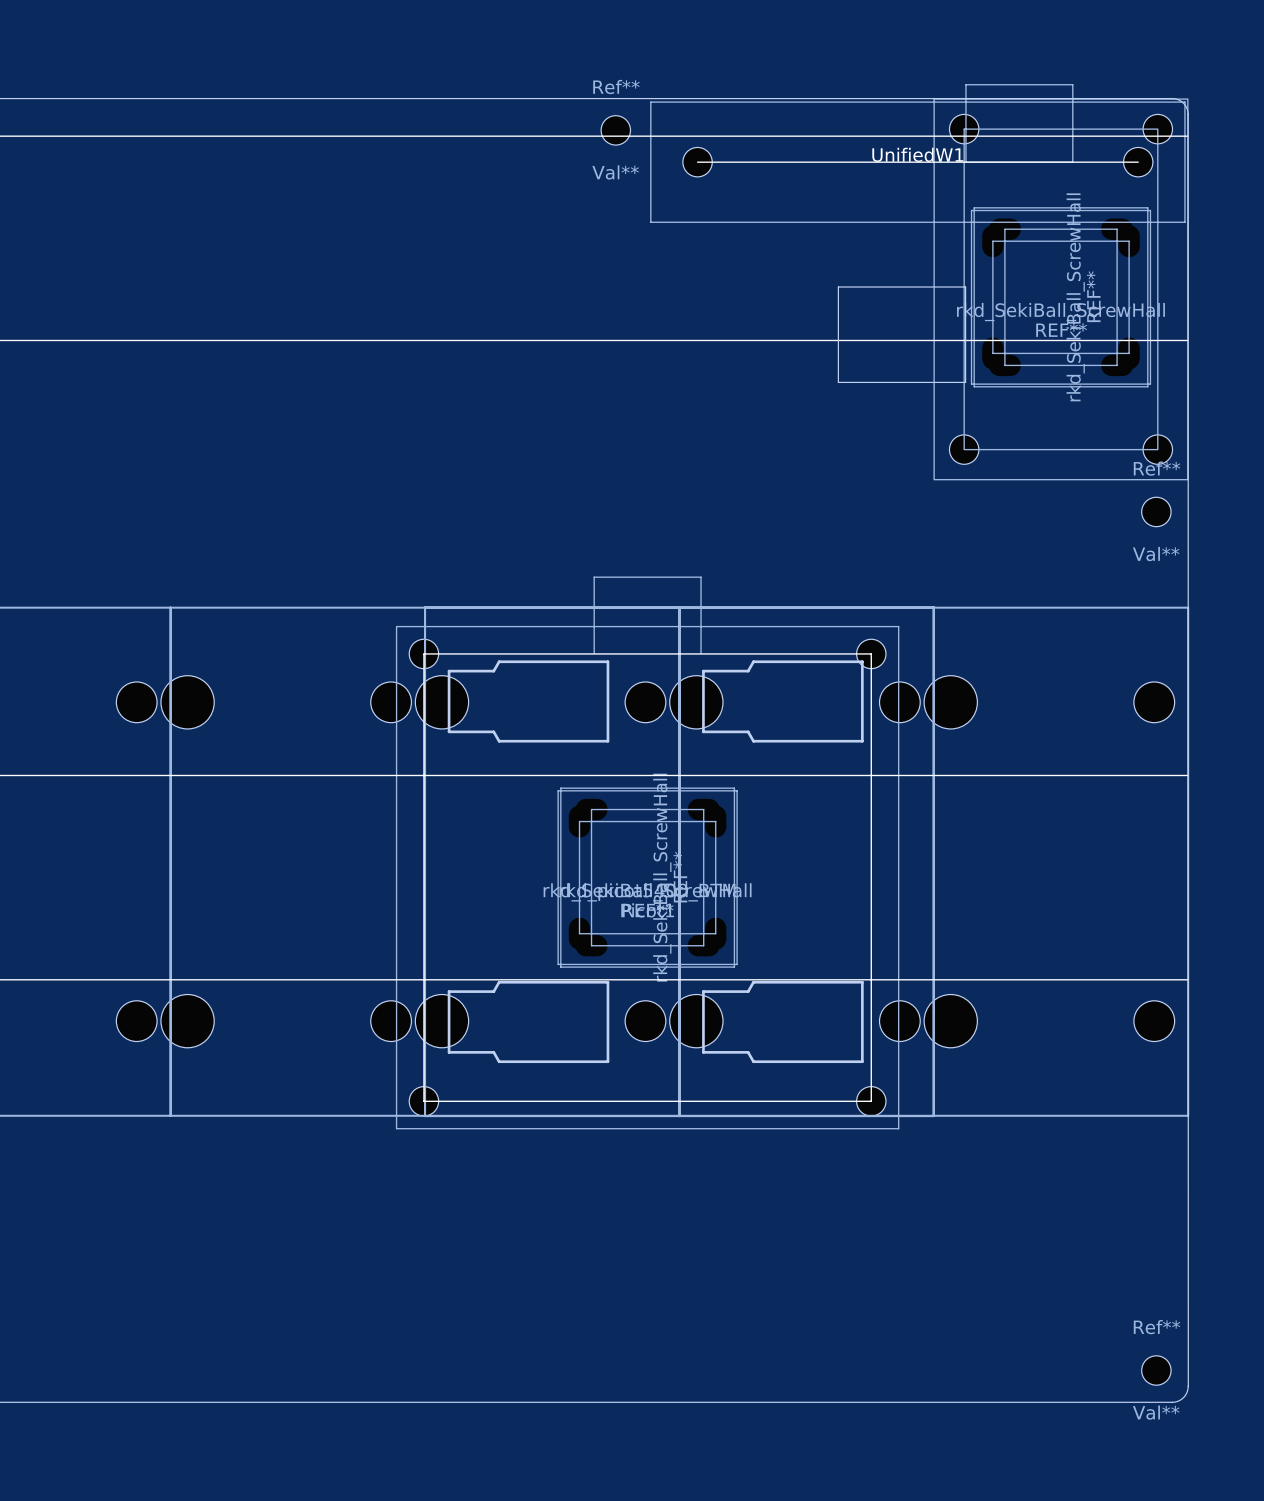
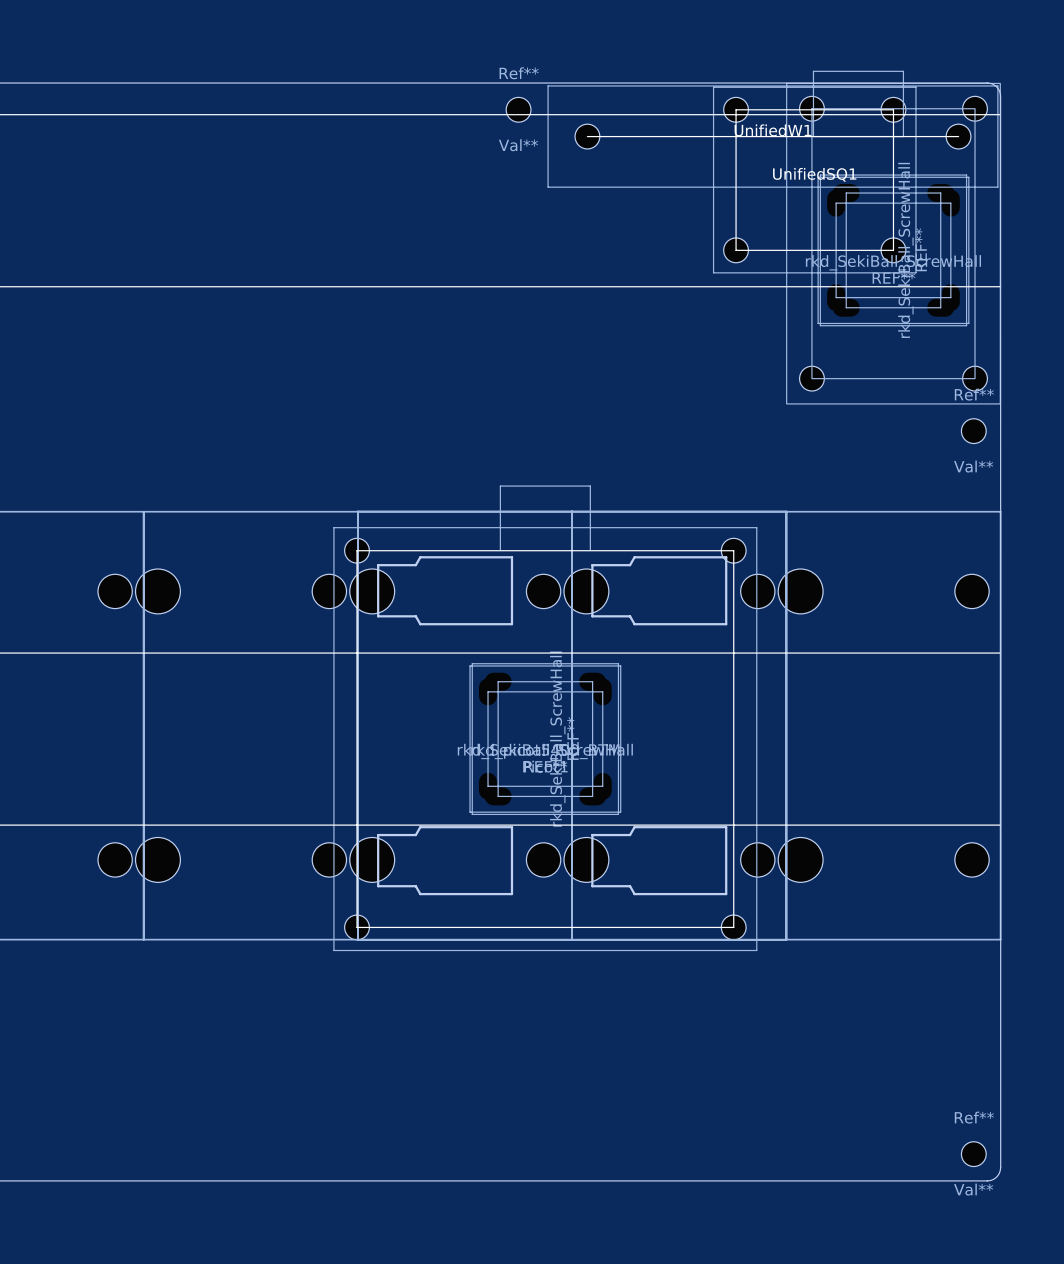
UnifiedSQ1: none -> (814, 180)
board edge: (838, 287) (965, 287) (965, 382) (838, 382) (838, 287) -> none

